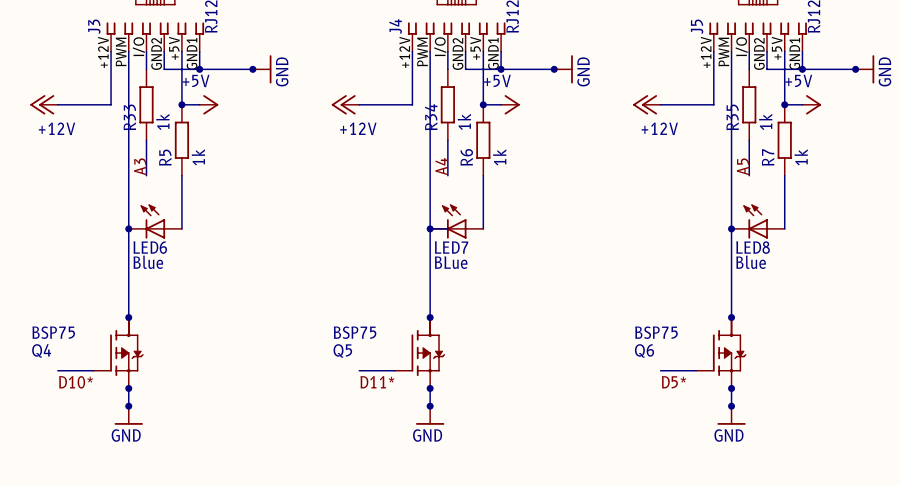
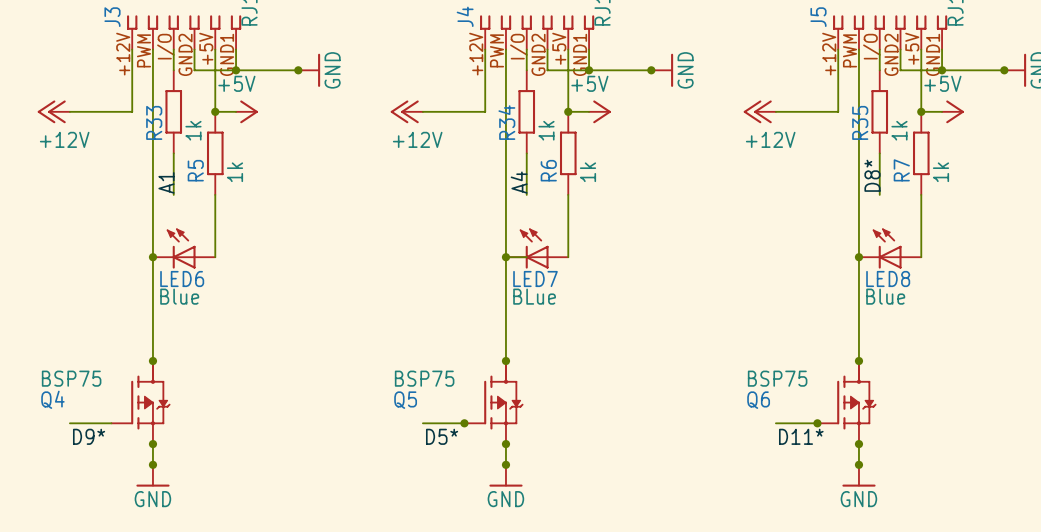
label: A3 (140, 166) -> A1 (166, 182)
label: A5 (743, 166) -> D8* (872, 175)
junction: none -> (464, 423)
junction: none -> (817, 423)
label: D10* (76, 382) -> D9* (89, 436)
label: D11* (377, 382) -> D5* (442, 436)
label: D5* (674, 382) -> D11* (801, 436)

